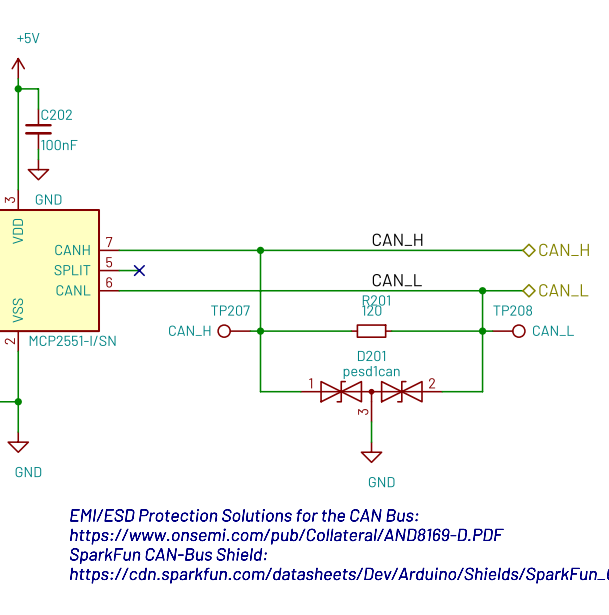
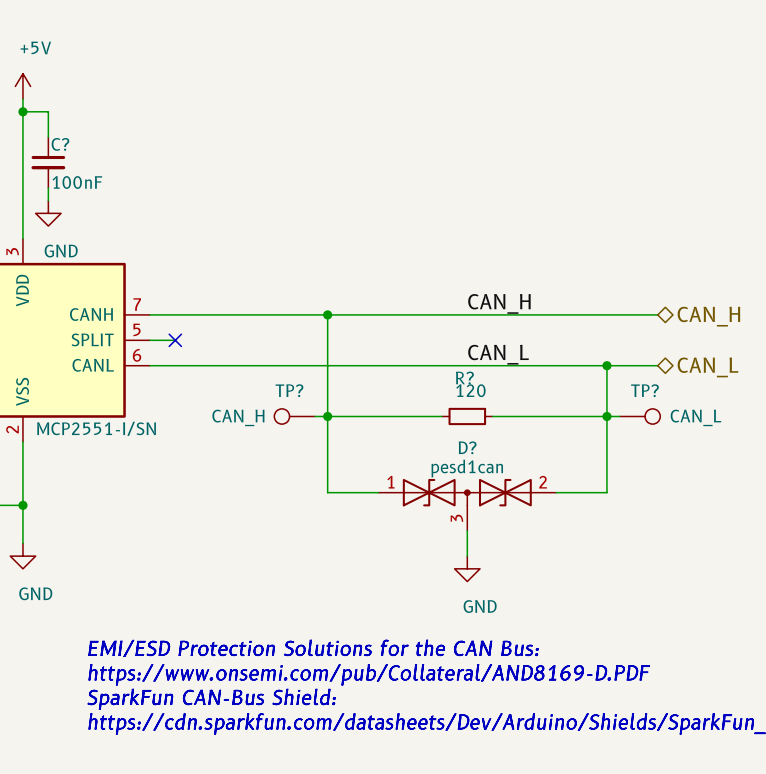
C202 name: C202 (56, 114) -> C? (60, 144)
R201 name: R201 (376, 300) -> R? (464, 378)
TP207 name: TP207 (230, 310) -> TP? (289, 390)
TP208 name: TP208 (512, 310) -> TP? (644, 390)
D201 name: D201 (371, 355) -> D? (467, 447)

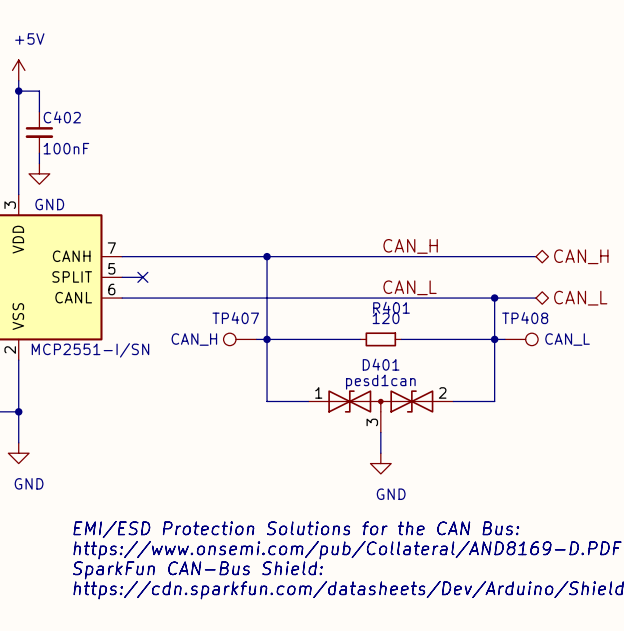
C? name: C? (60, 144) -> C402 (62, 117)
R? name: R? (464, 378) -> R401 (391, 307)
TP? name: TP? (289, 390) -> TP407 (235, 318)
TP? name: TP? (644, 390) -> TP408 (525, 318)
D? name: D? (467, 447) -> D401 (381, 364)

